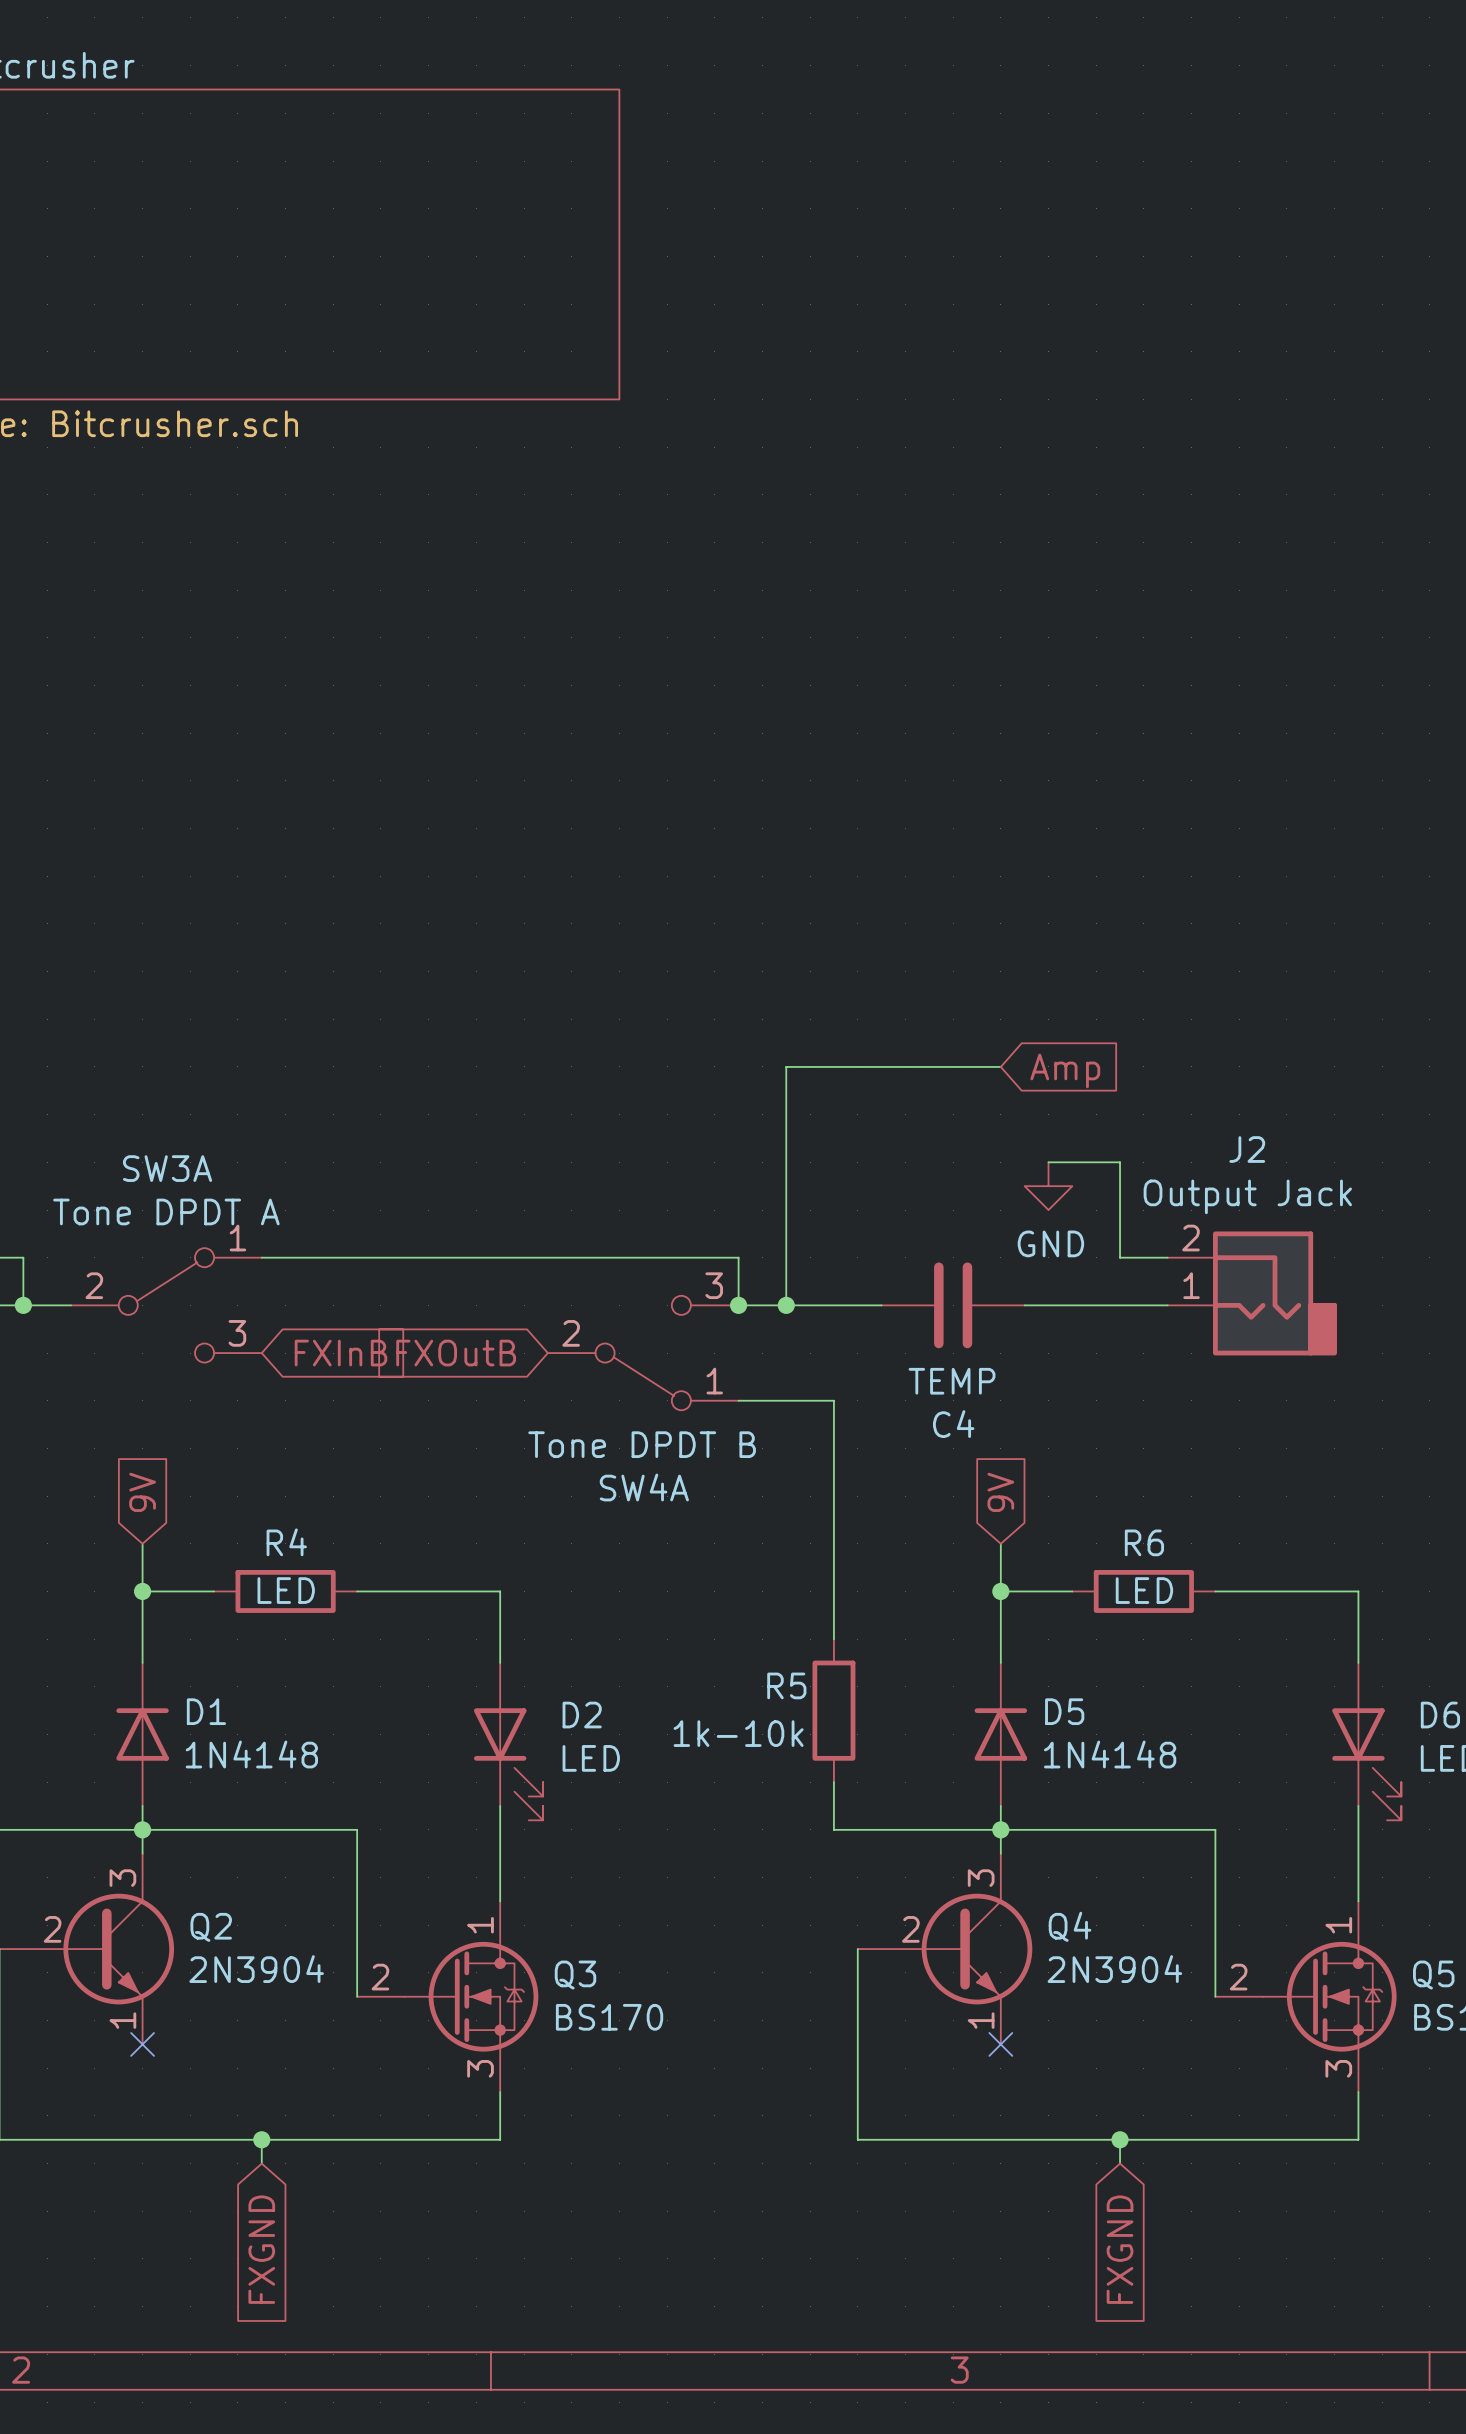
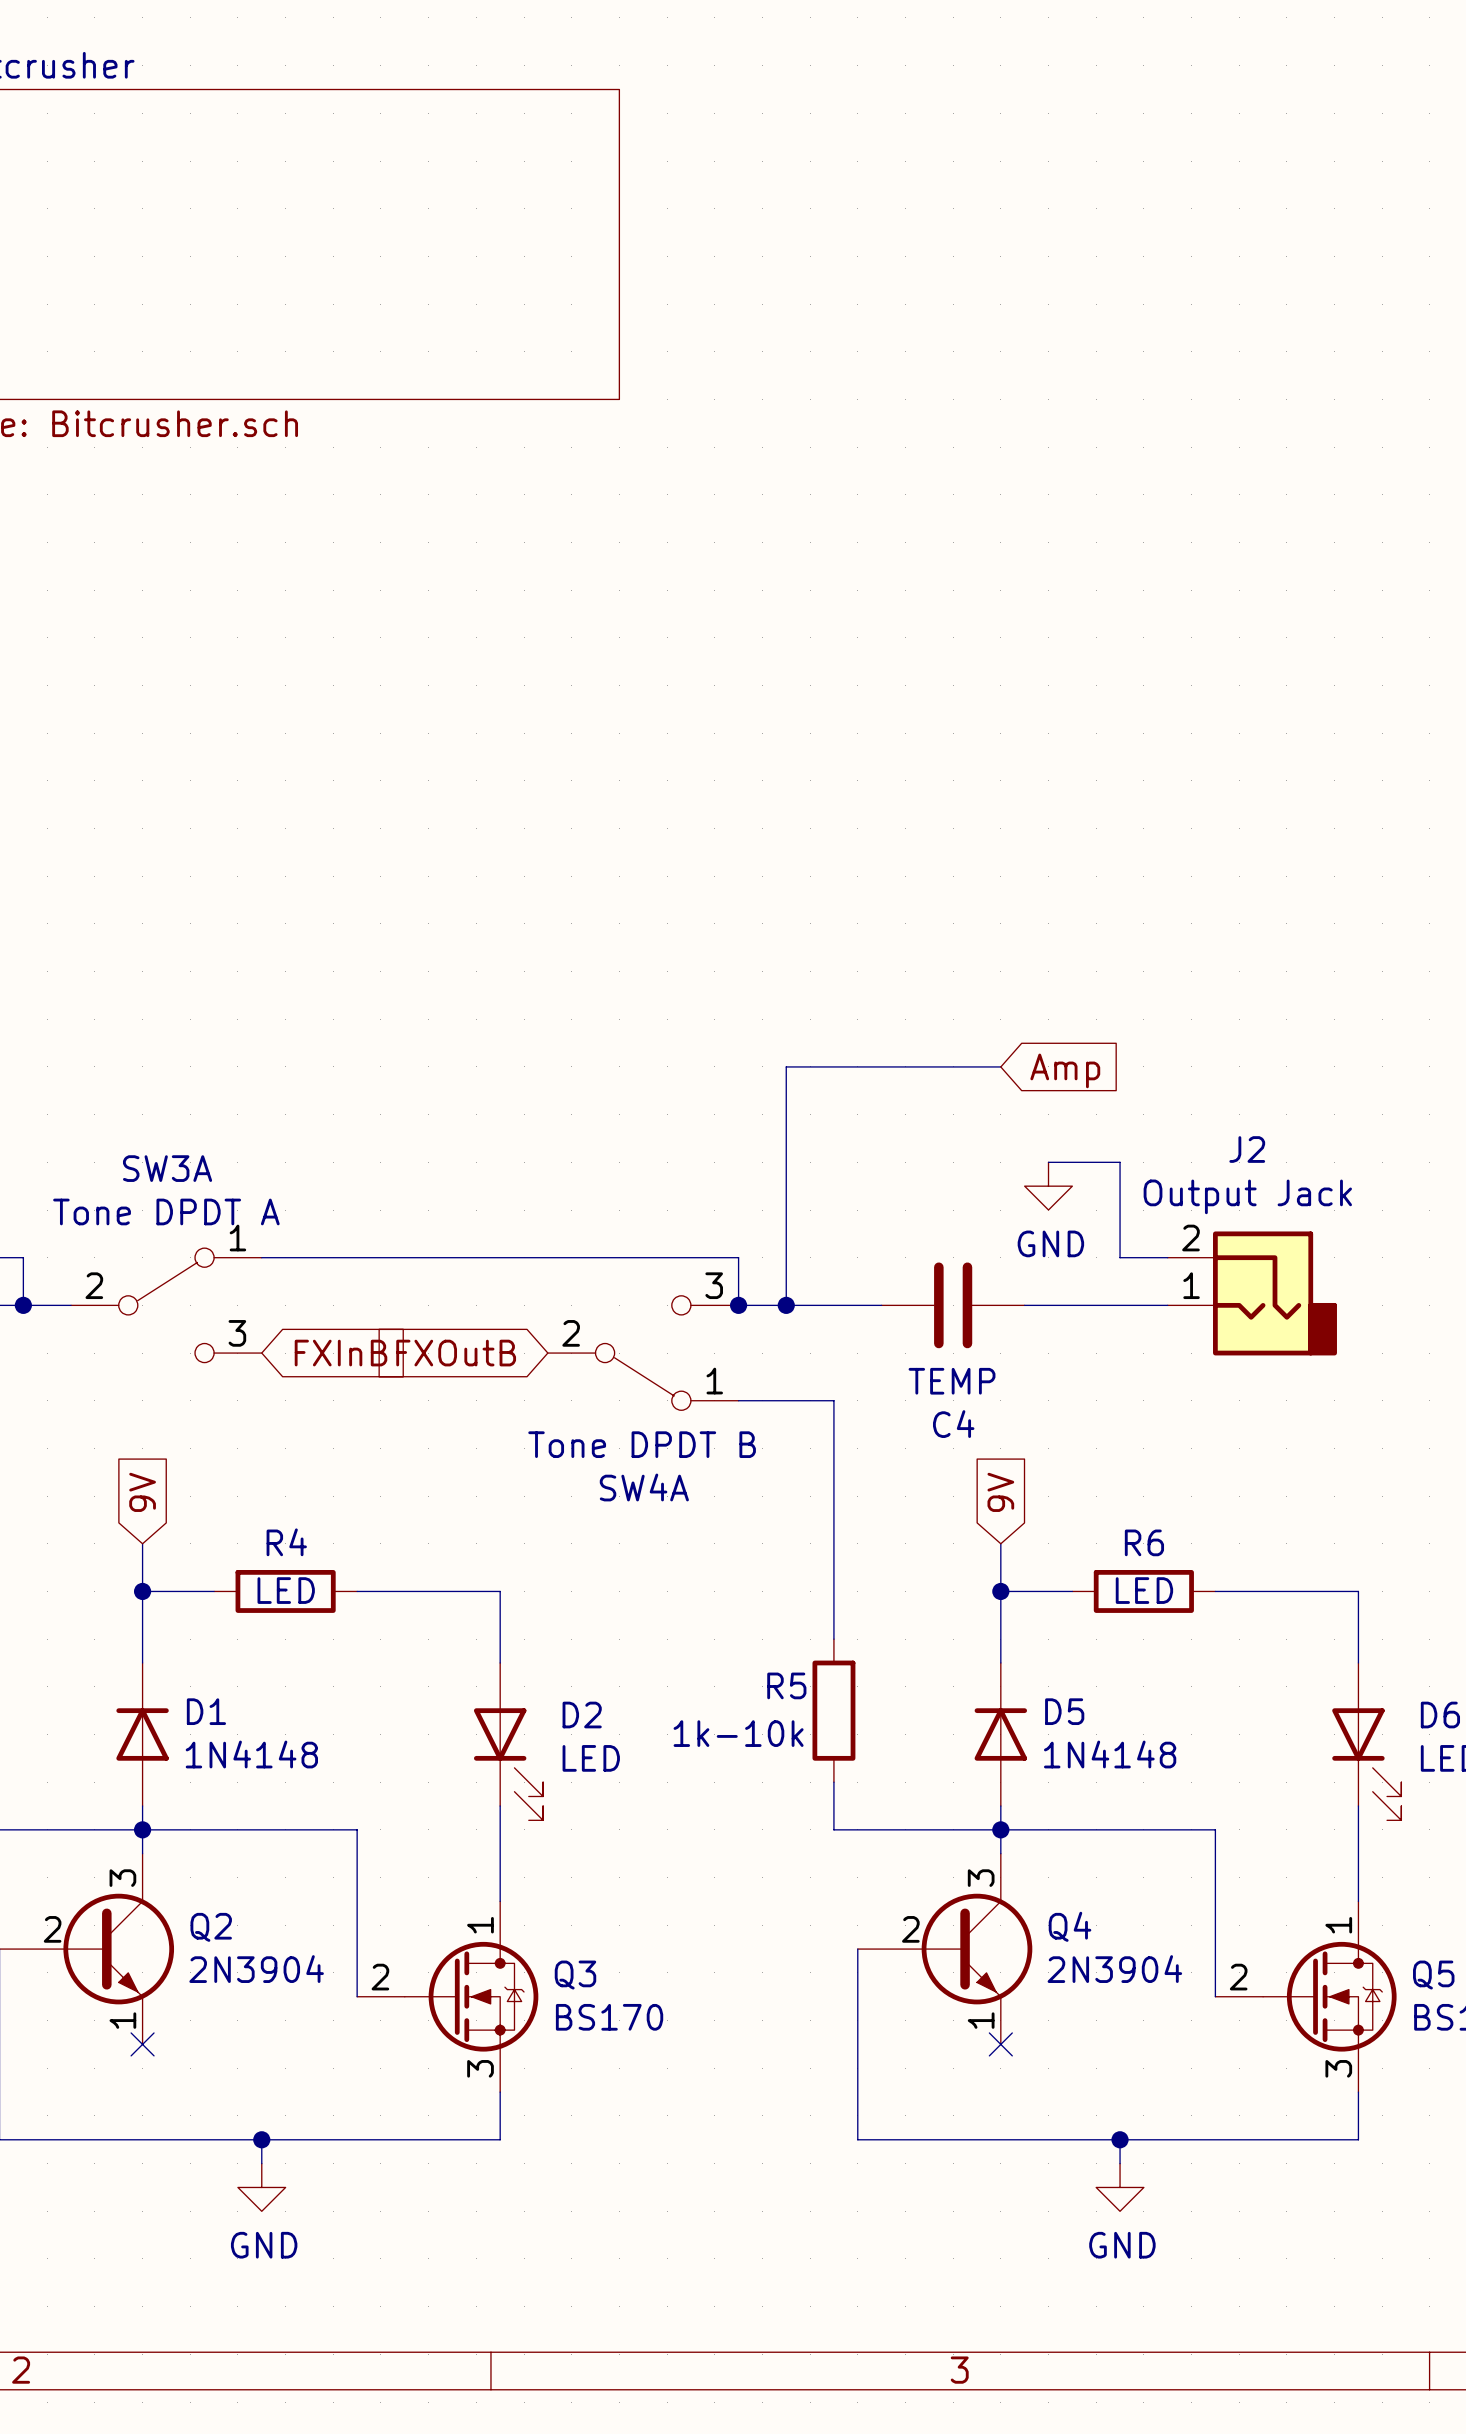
power symbol: none -> GND (261, 2187)
power symbol: none -> GND (1120, 2187)
global label: FXGND (261, 2249) -> none
global label: FXGND (1120, 2249) -> none

